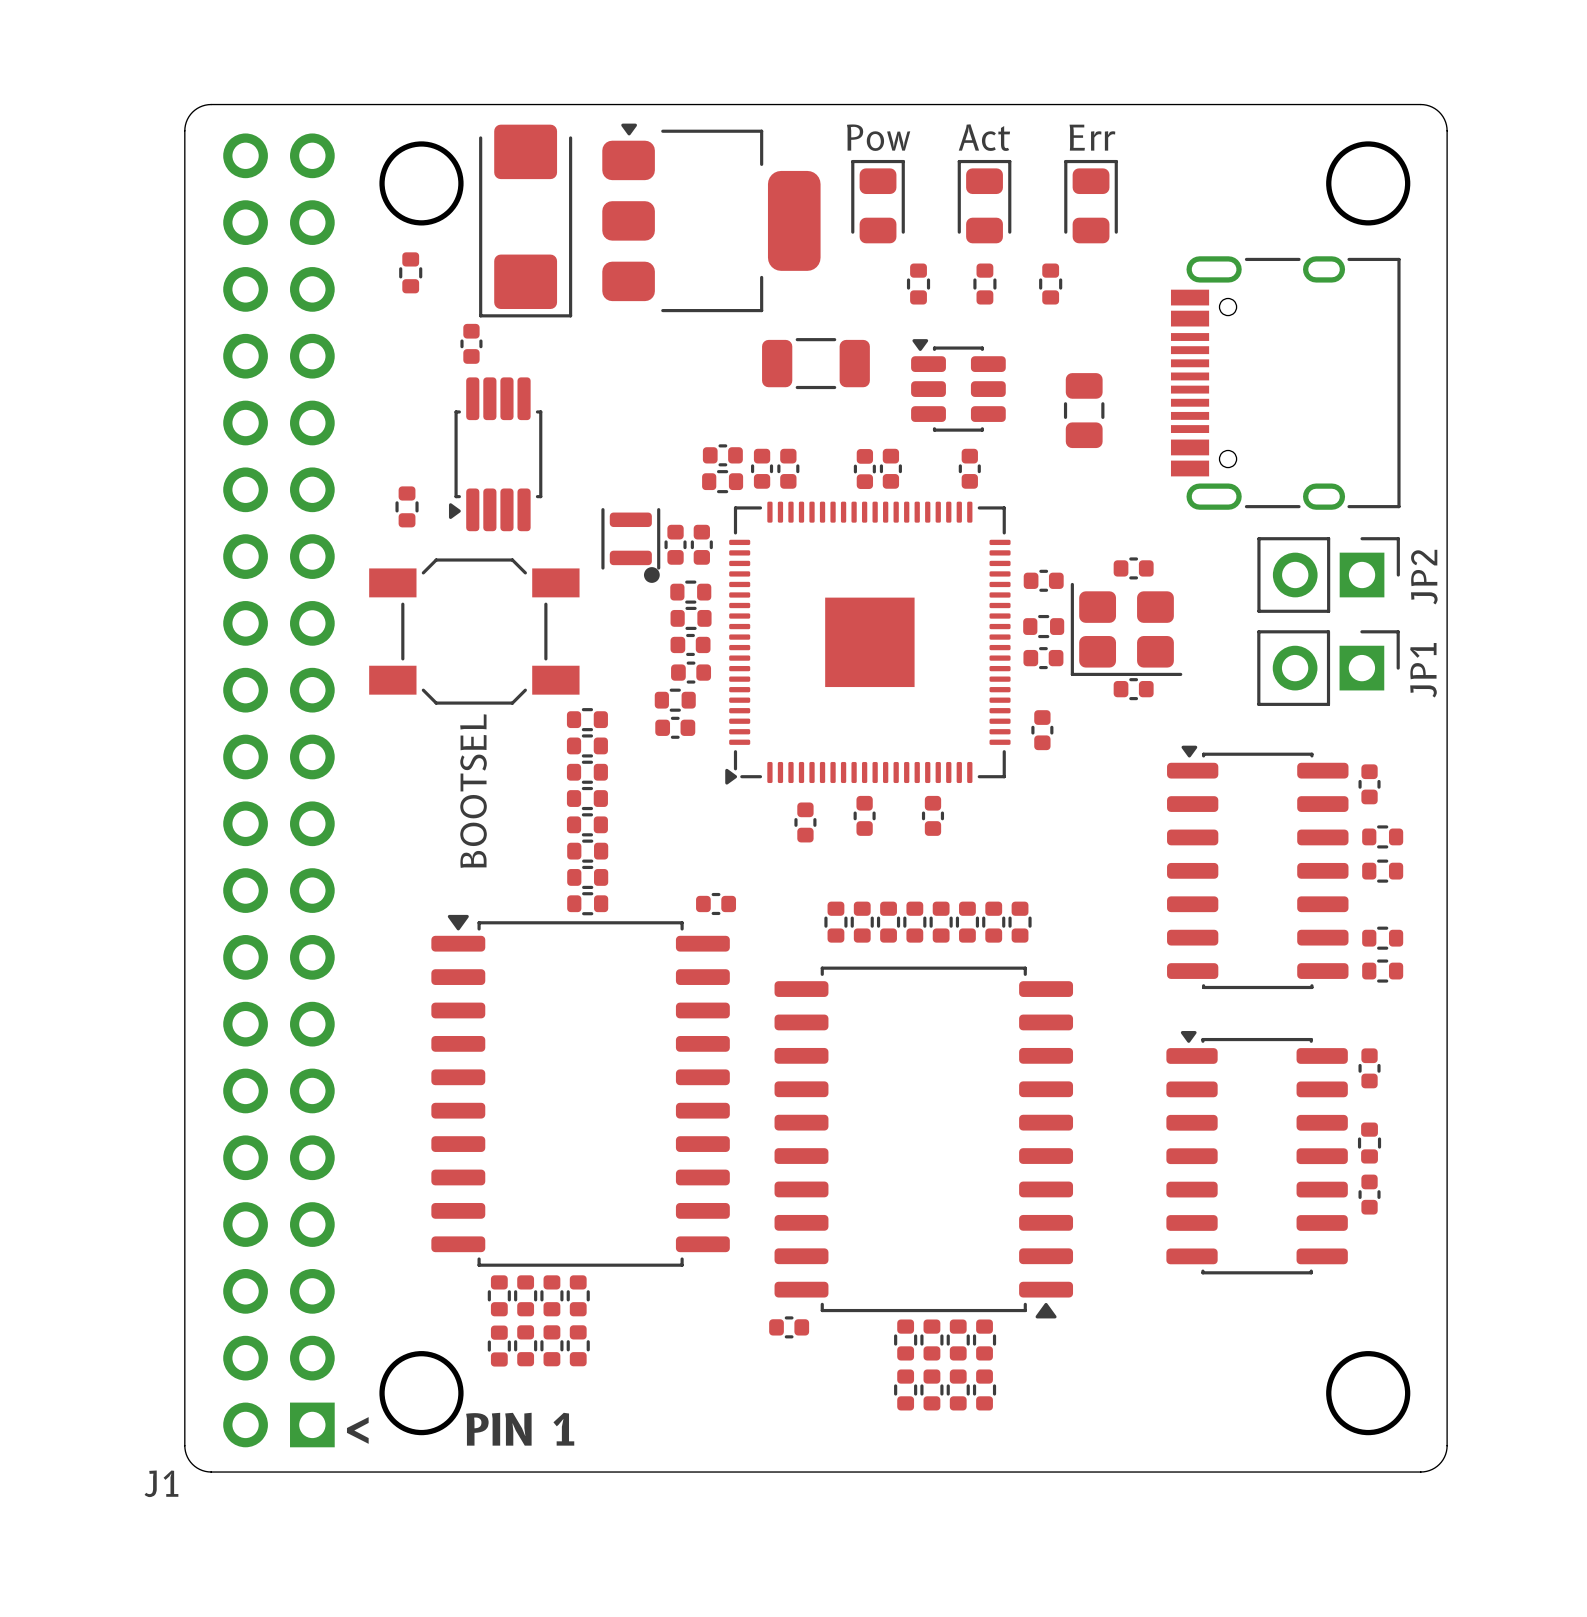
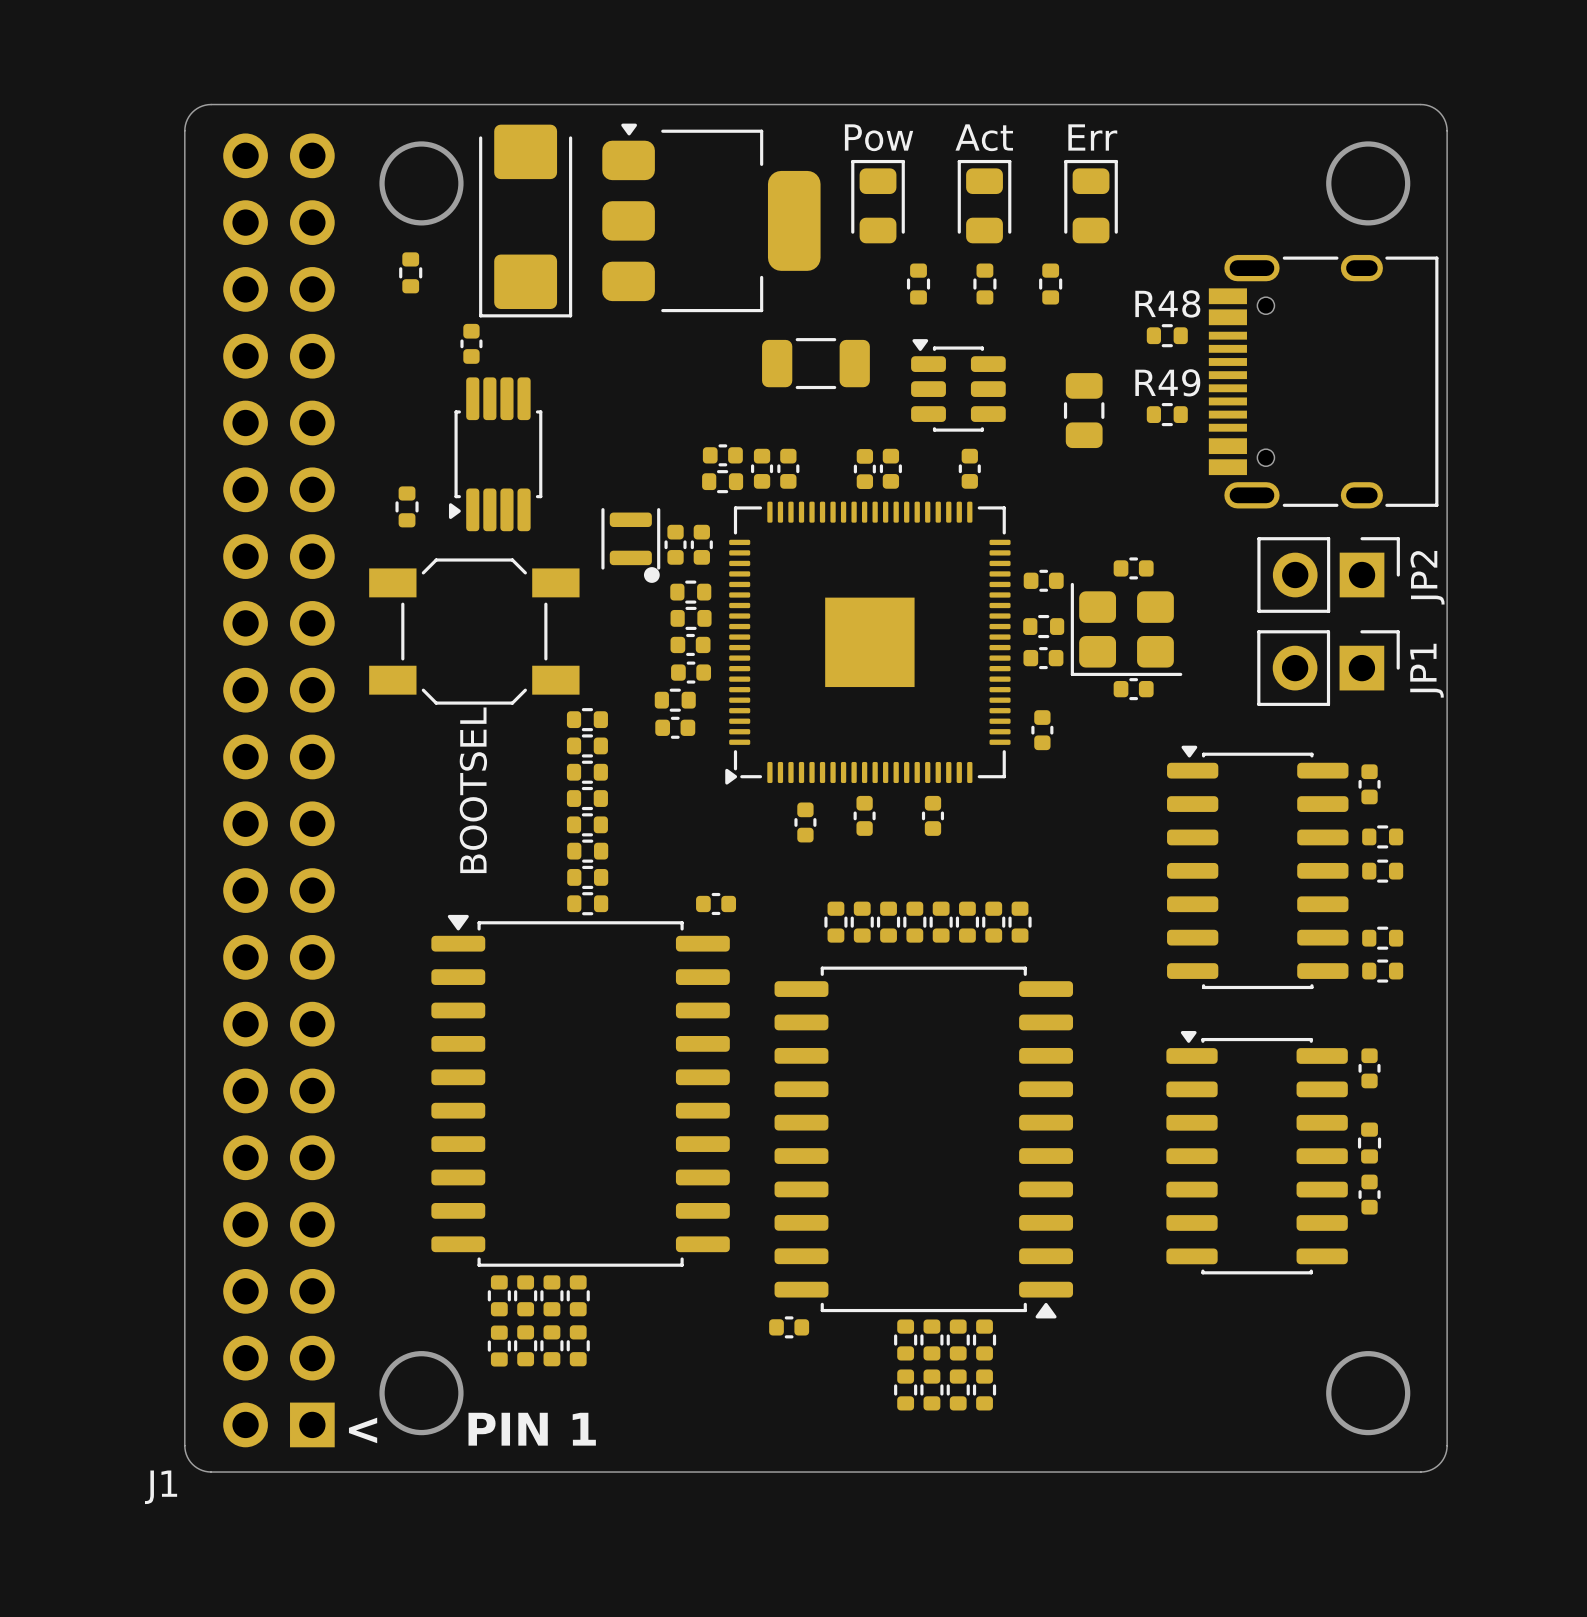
R48: none -> (1167, 335)
part position: (1285, 383) -> (1323, 381)
R49: none -> (1167, 414)

